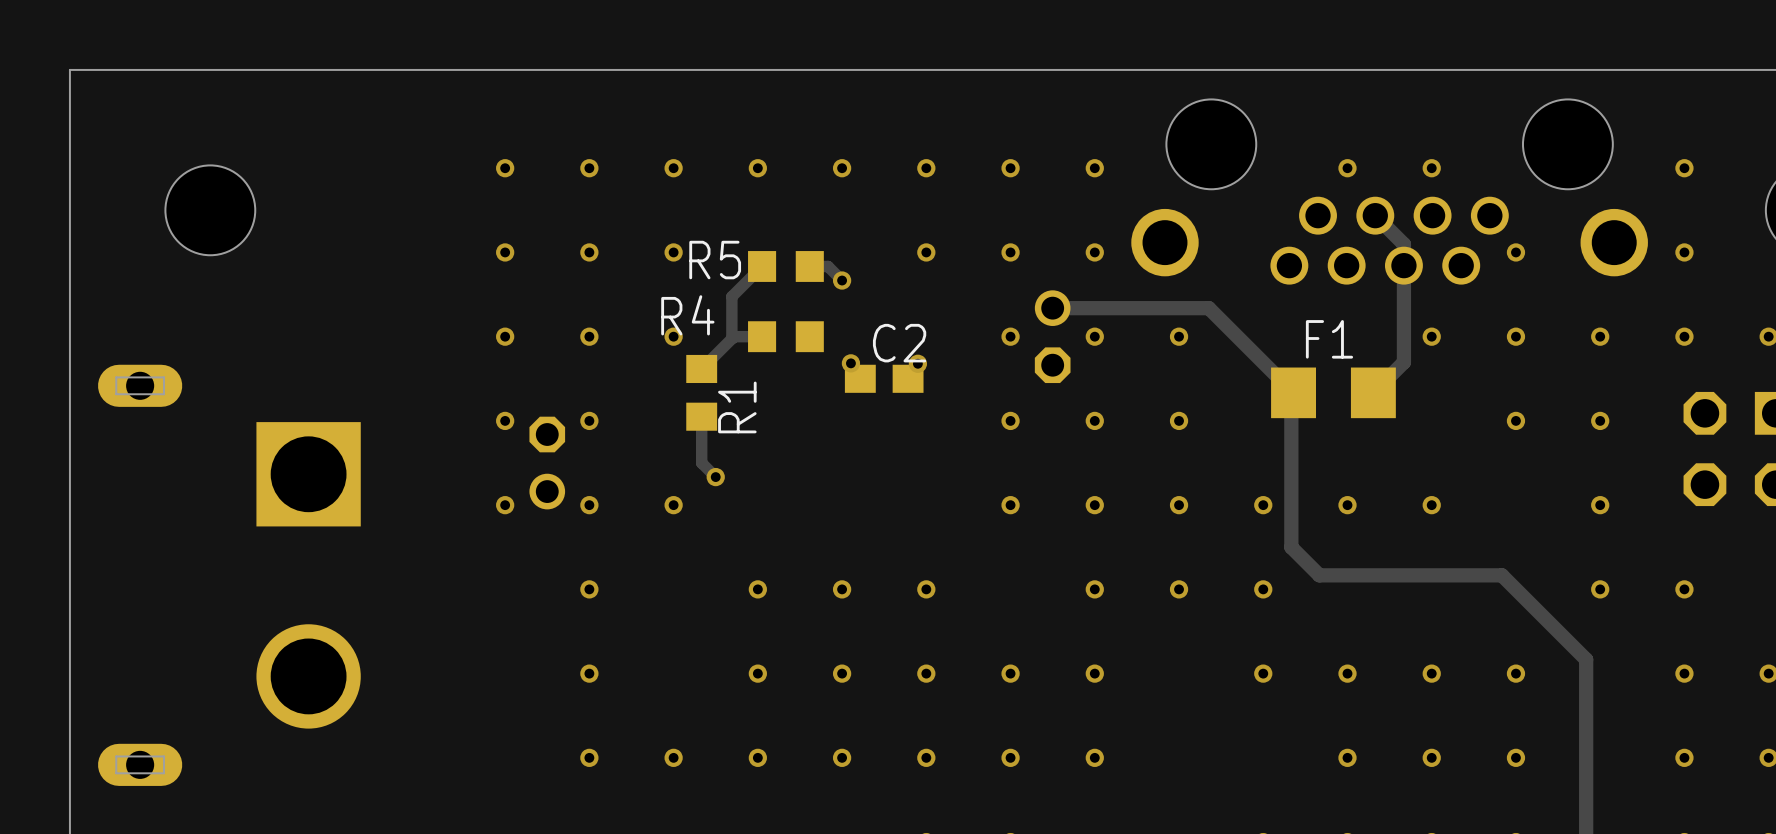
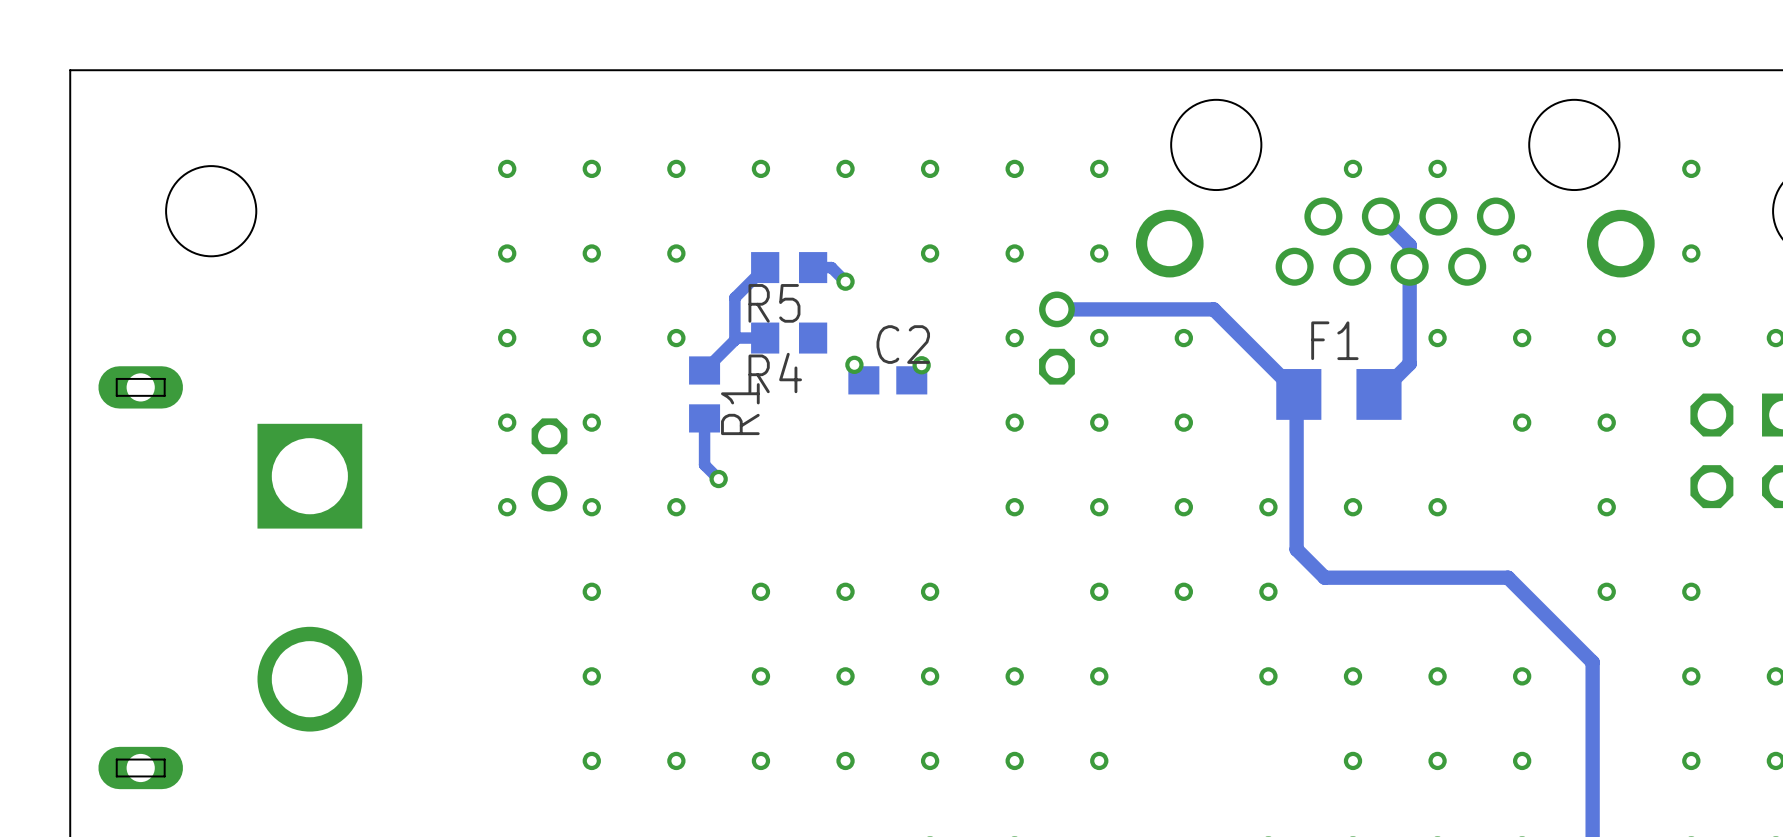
R5 name position: R5 (715, 260) -> R5 (774, 303)
R4 name position: R4 (687, 315) -> R4 (775, 373)

